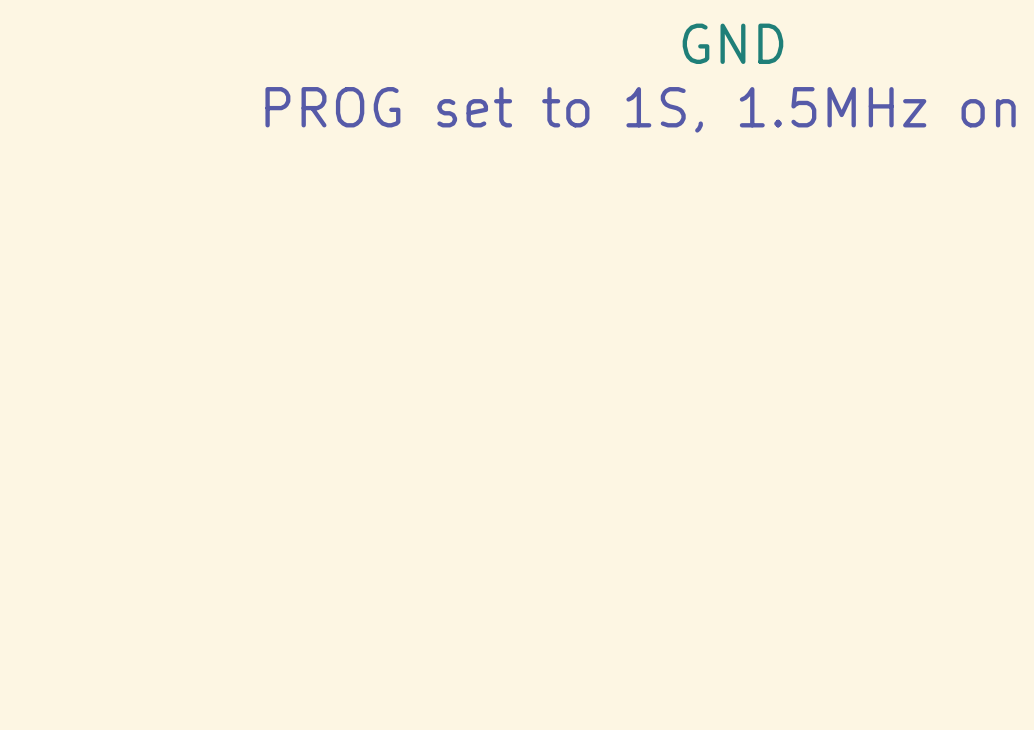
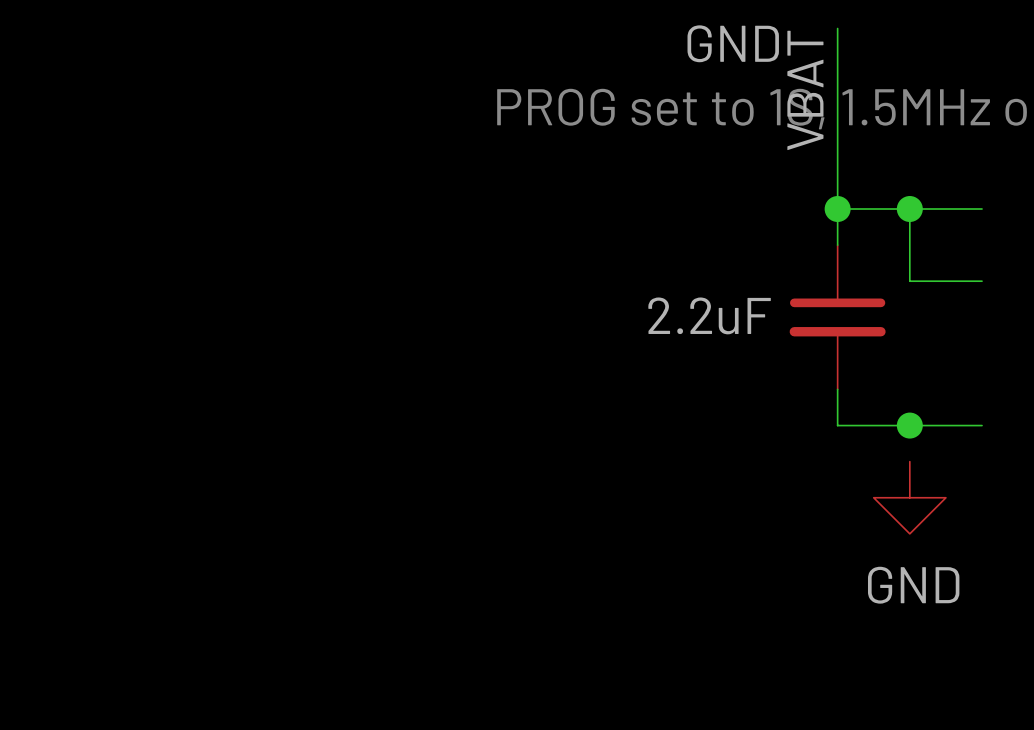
wire: none -> (837, 28) (837, 245)
label: none -> VBAT (805, 90)
wire: none -> (837, 209) (982, 209)
junction: none -> (837, 209)
wire: none -> (909, 209) (909, 281) (982, 281)
junction: none -> (909, 209)
part: none -> 2.2uF (837, 317)
wire: none -> (837, 389) (837, 425) (982, 425)
junction: none -> (909, 425)
power symbol: none -> GND (909, 497)

